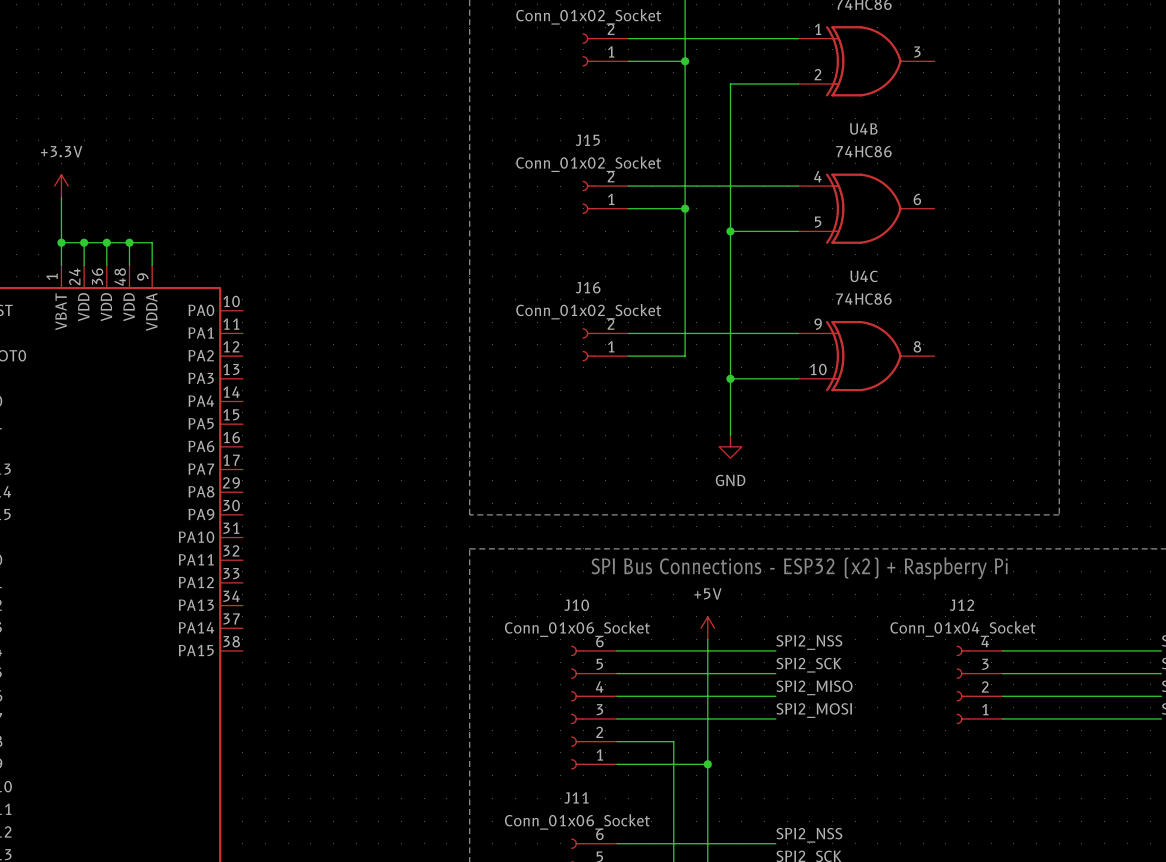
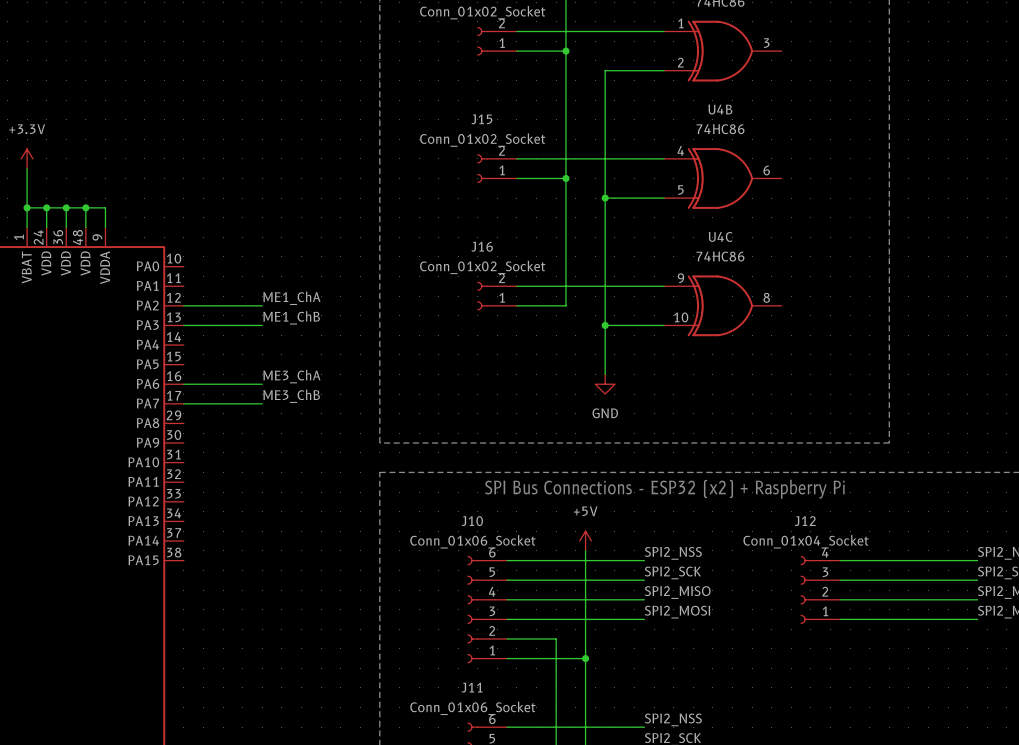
label: none -> ME1_ChA (291, 298)
wire: none -> (183, 305) (262, 305)
label: none -> ME1_ChB (291, 317)
wire: none -> (183, 325) (262, 325)
label: none -> ME3_ChA (291, 376)
wire: none -> (183, 384) (262, 384)
label: none -> ME3_ChB (291, 396)
wire: none -> (183, 403) (262, 403)

